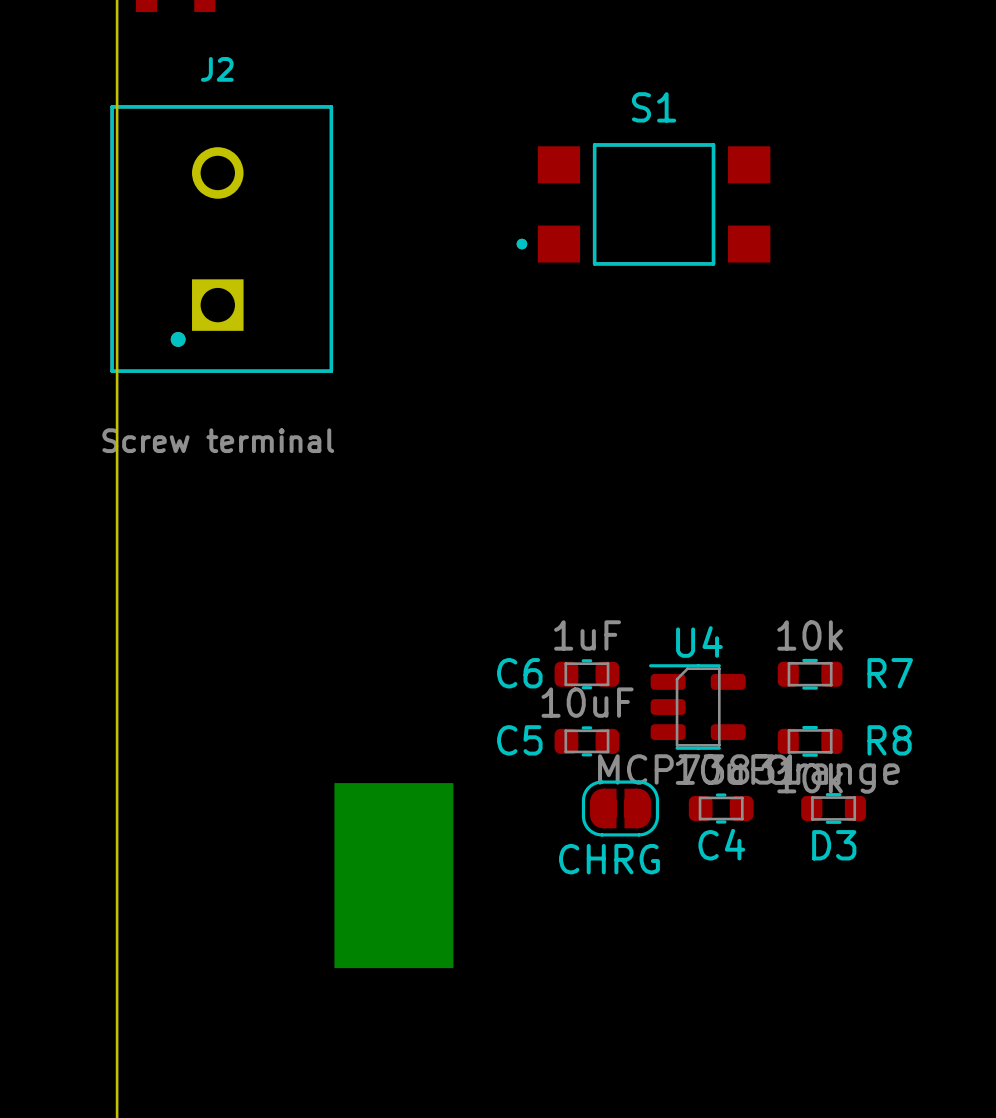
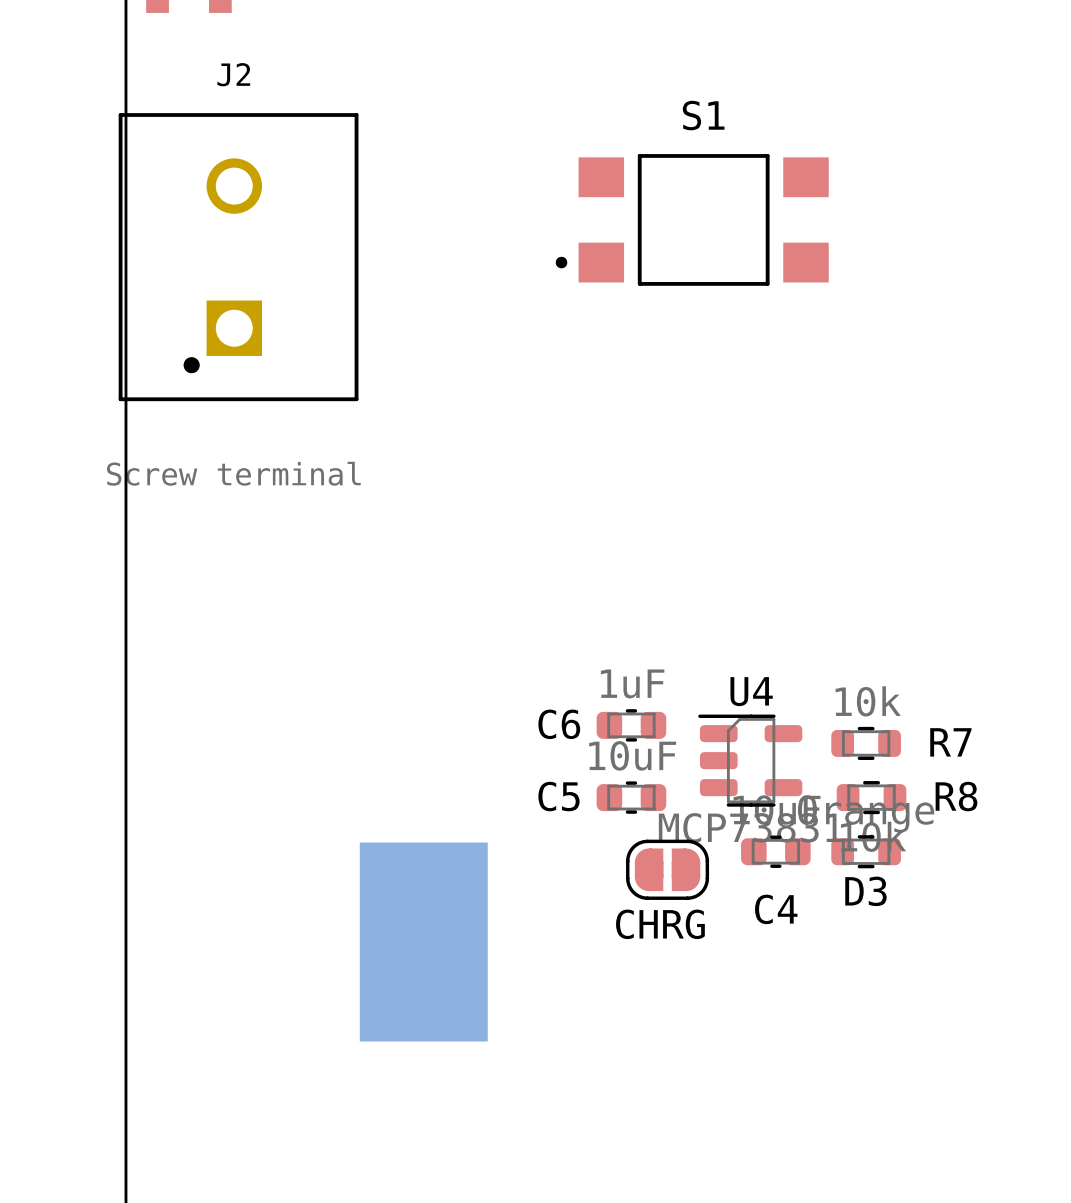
R7 position: (810, 674) -> (866, 743)
C4 position: (721, 808) -> (775, 851)
D3 position: (833, 808) -> (866, 851)
text position: CHRG (609, 859) -> CHRG (660, 924)

